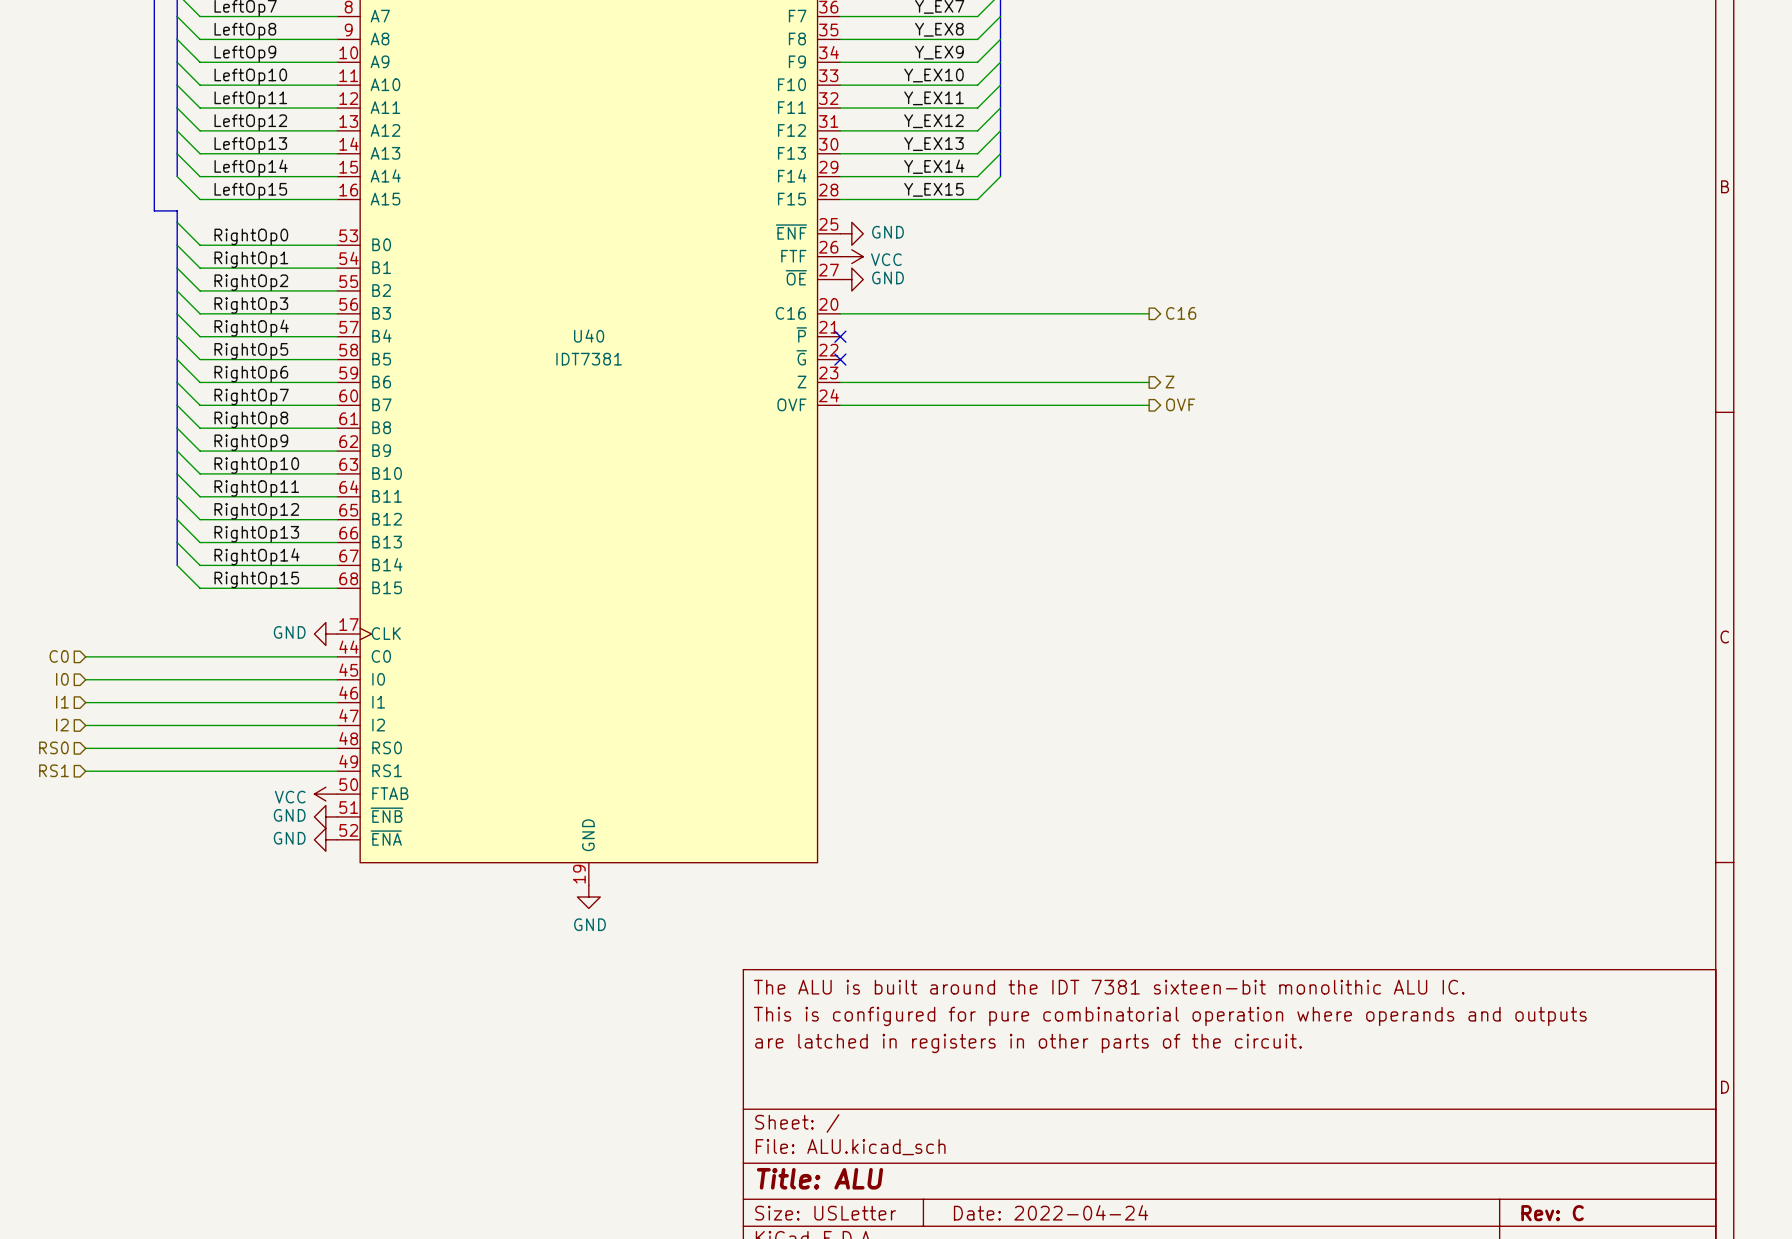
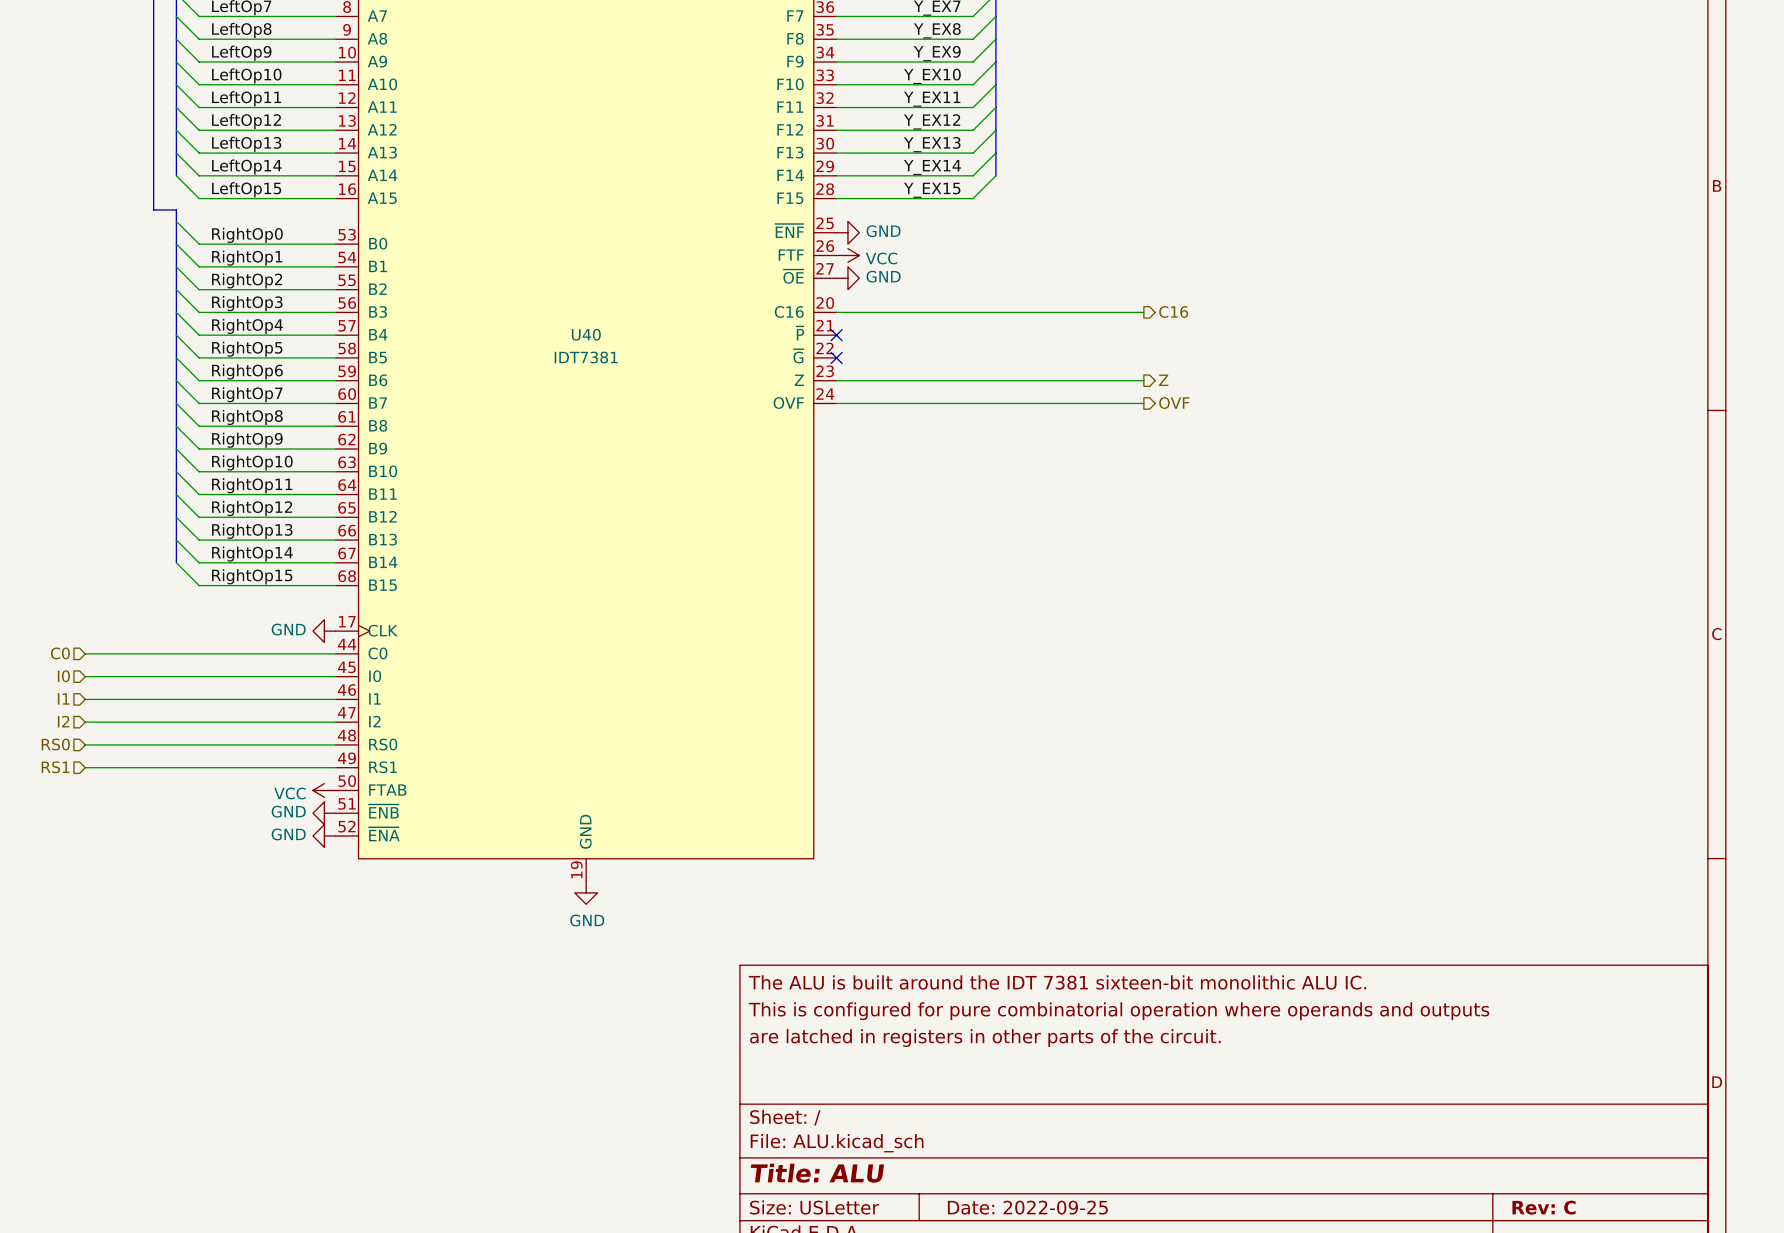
title block: Date: 2022-04-24 (1051, 1212) -> Date: 2022-09-25 (1027, 1207)

